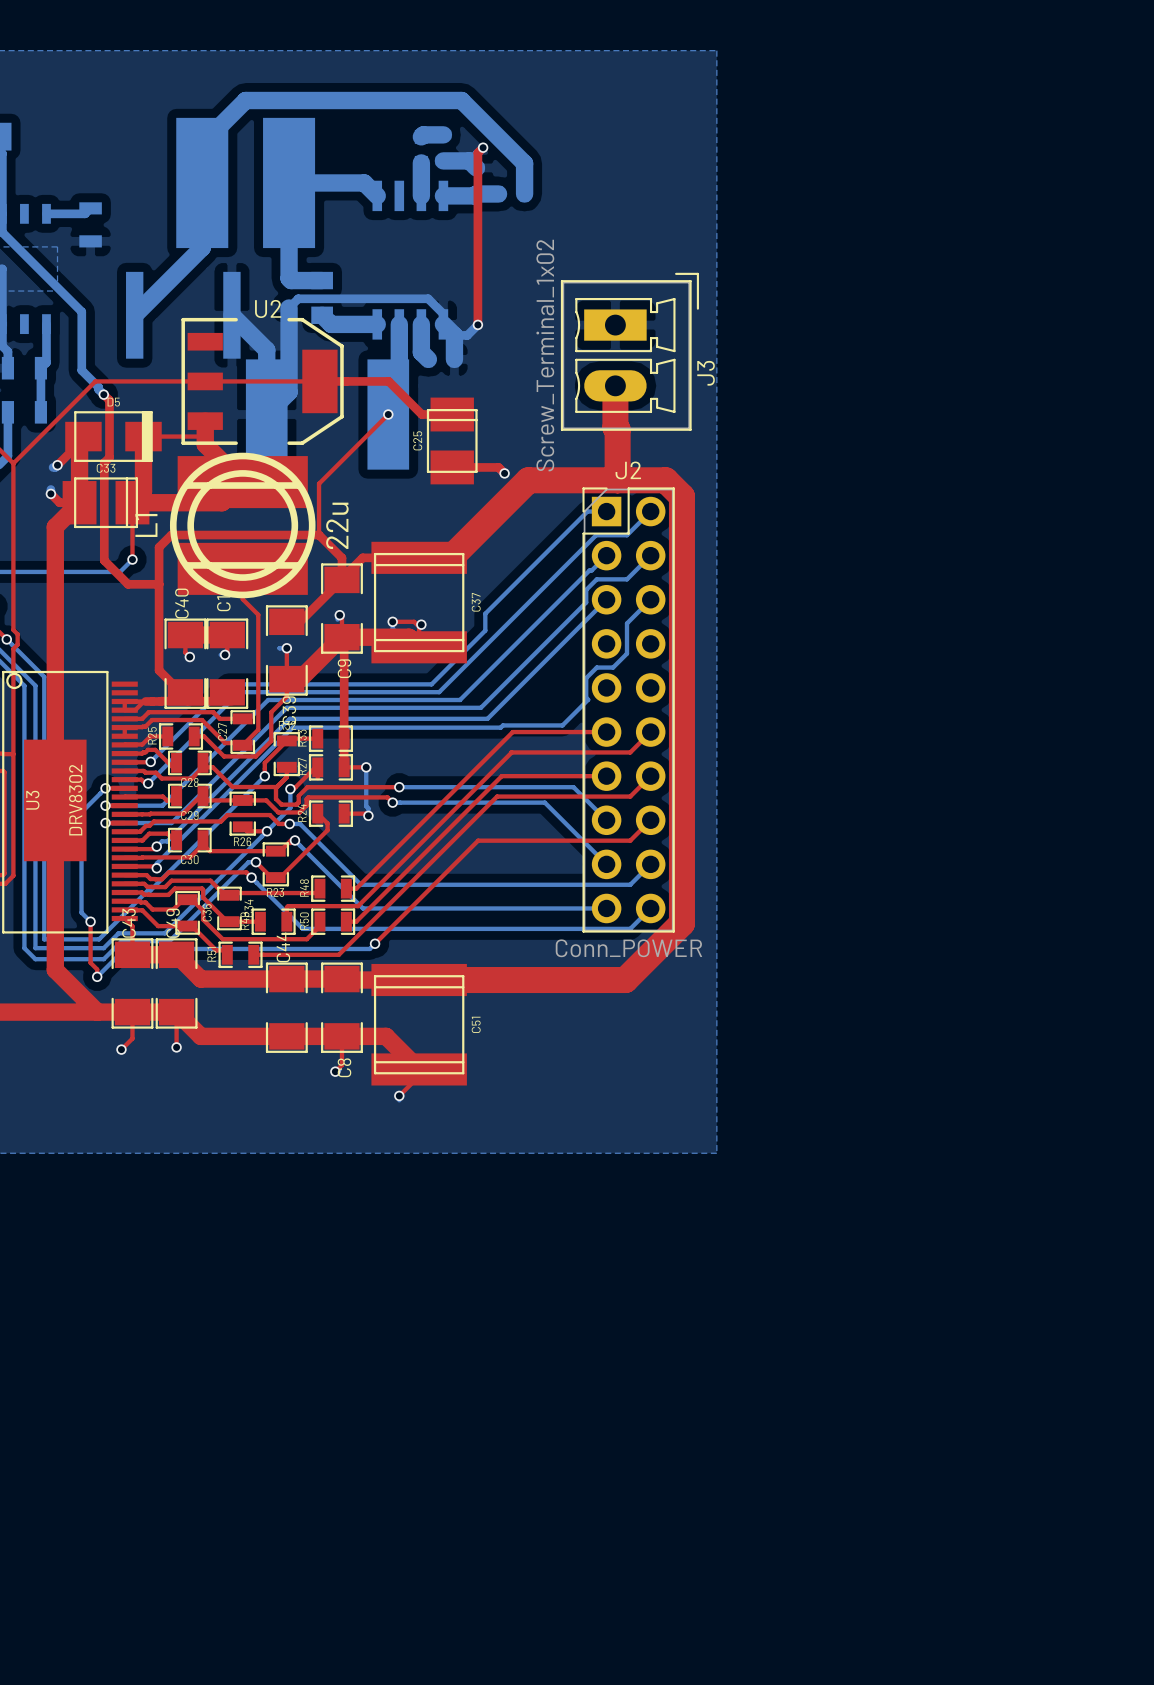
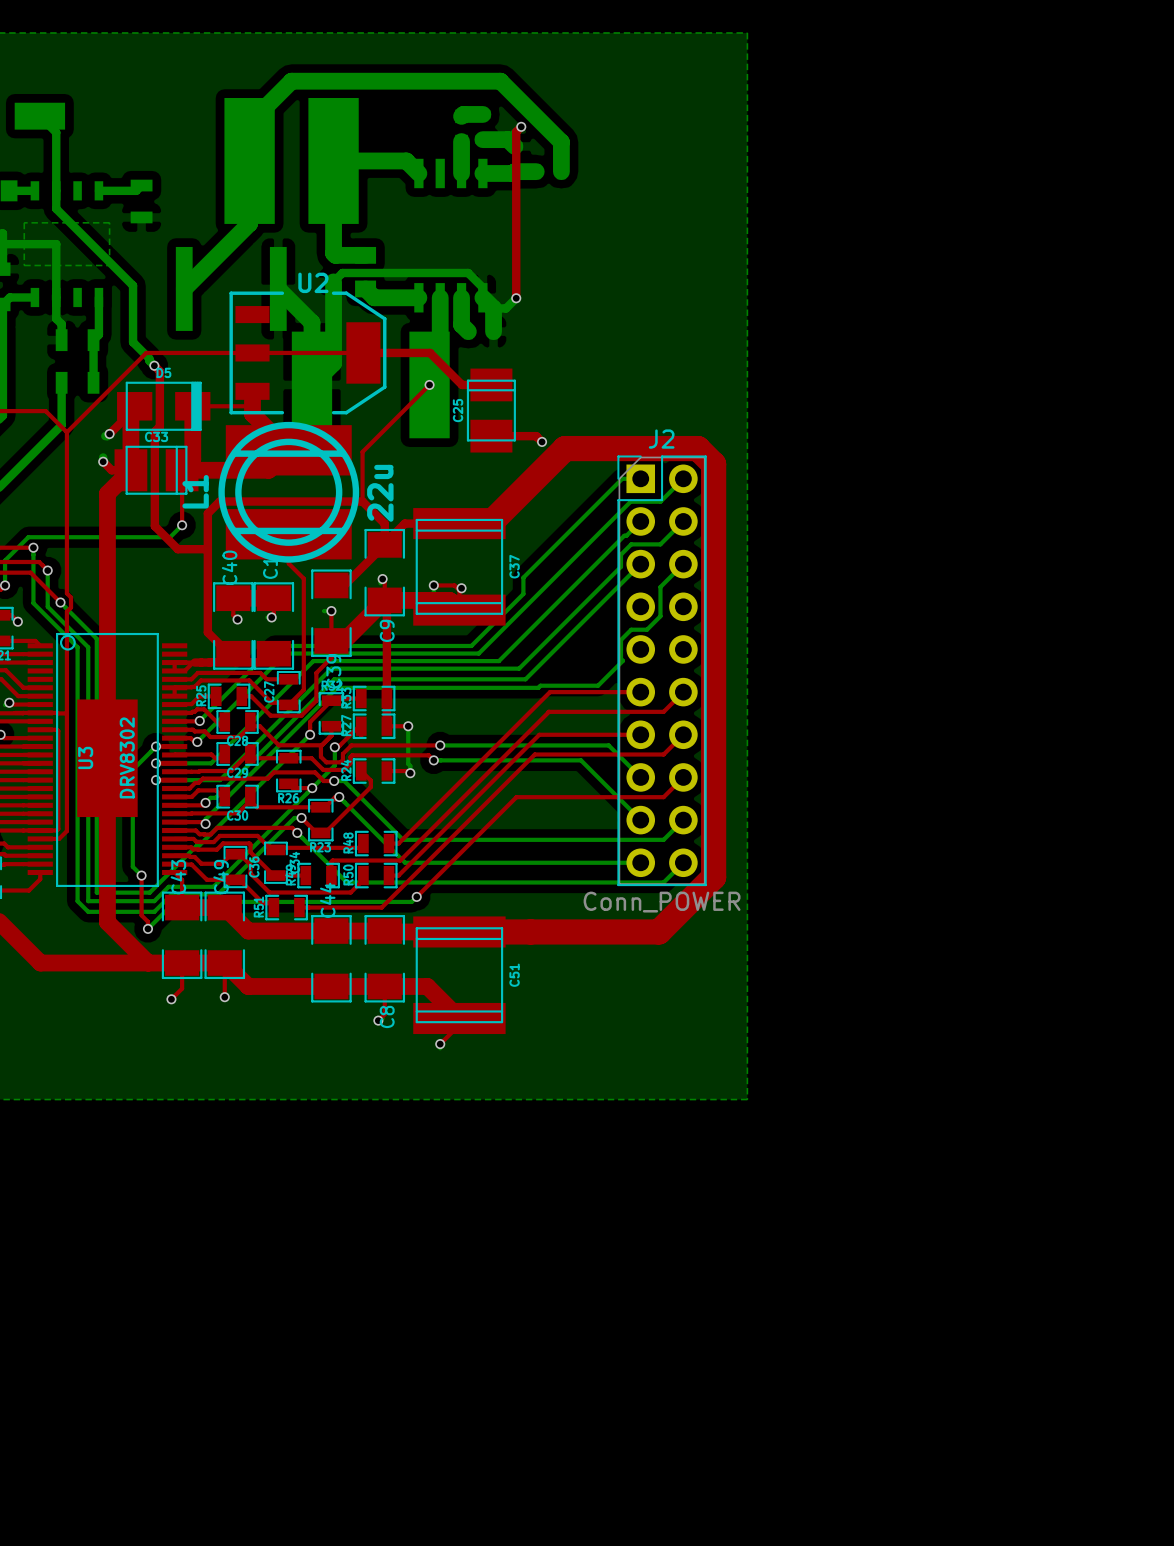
J3: Screw_Terminal_1x02 (629, 351) -> none
top track: (615, 385) (617, 480) -> none

